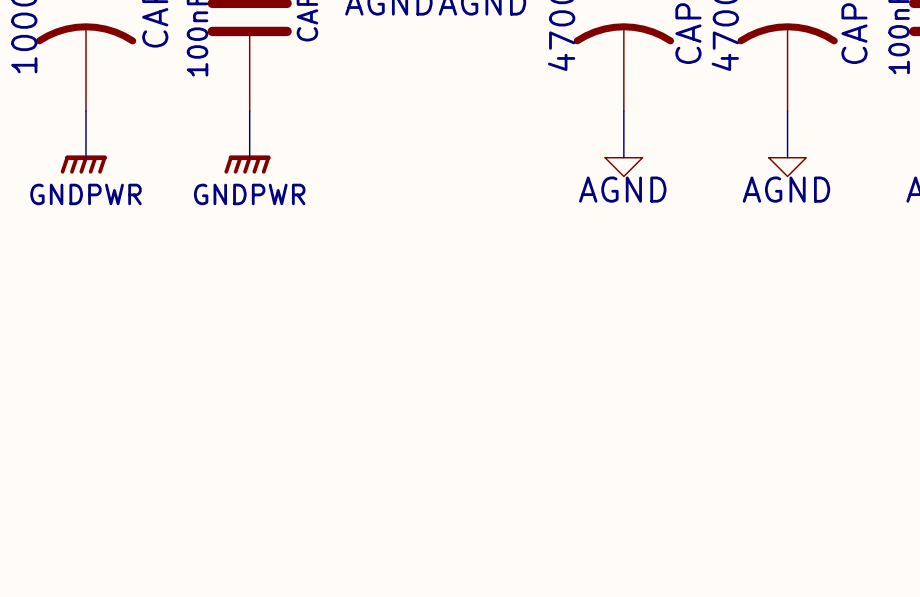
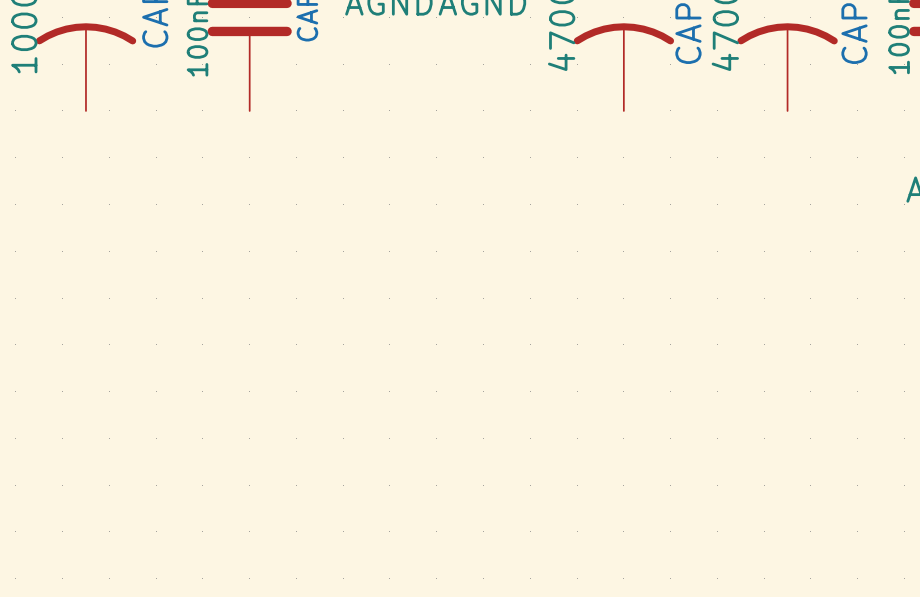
wire: (85, 110) (85, 157) -> none
wire: (249, 110) (249, 157) -> none
wire: (623, 110) (623, 157) -> none
wire: (787, 110) (787, 157) -> none
power symbol: GNDPWR (83, 164) -> none
power symbol: GNDPWR (247, 164) -> none
power symbol: AGND (623, 167) -> none
power symbol: AGND (787, 167) -> none

